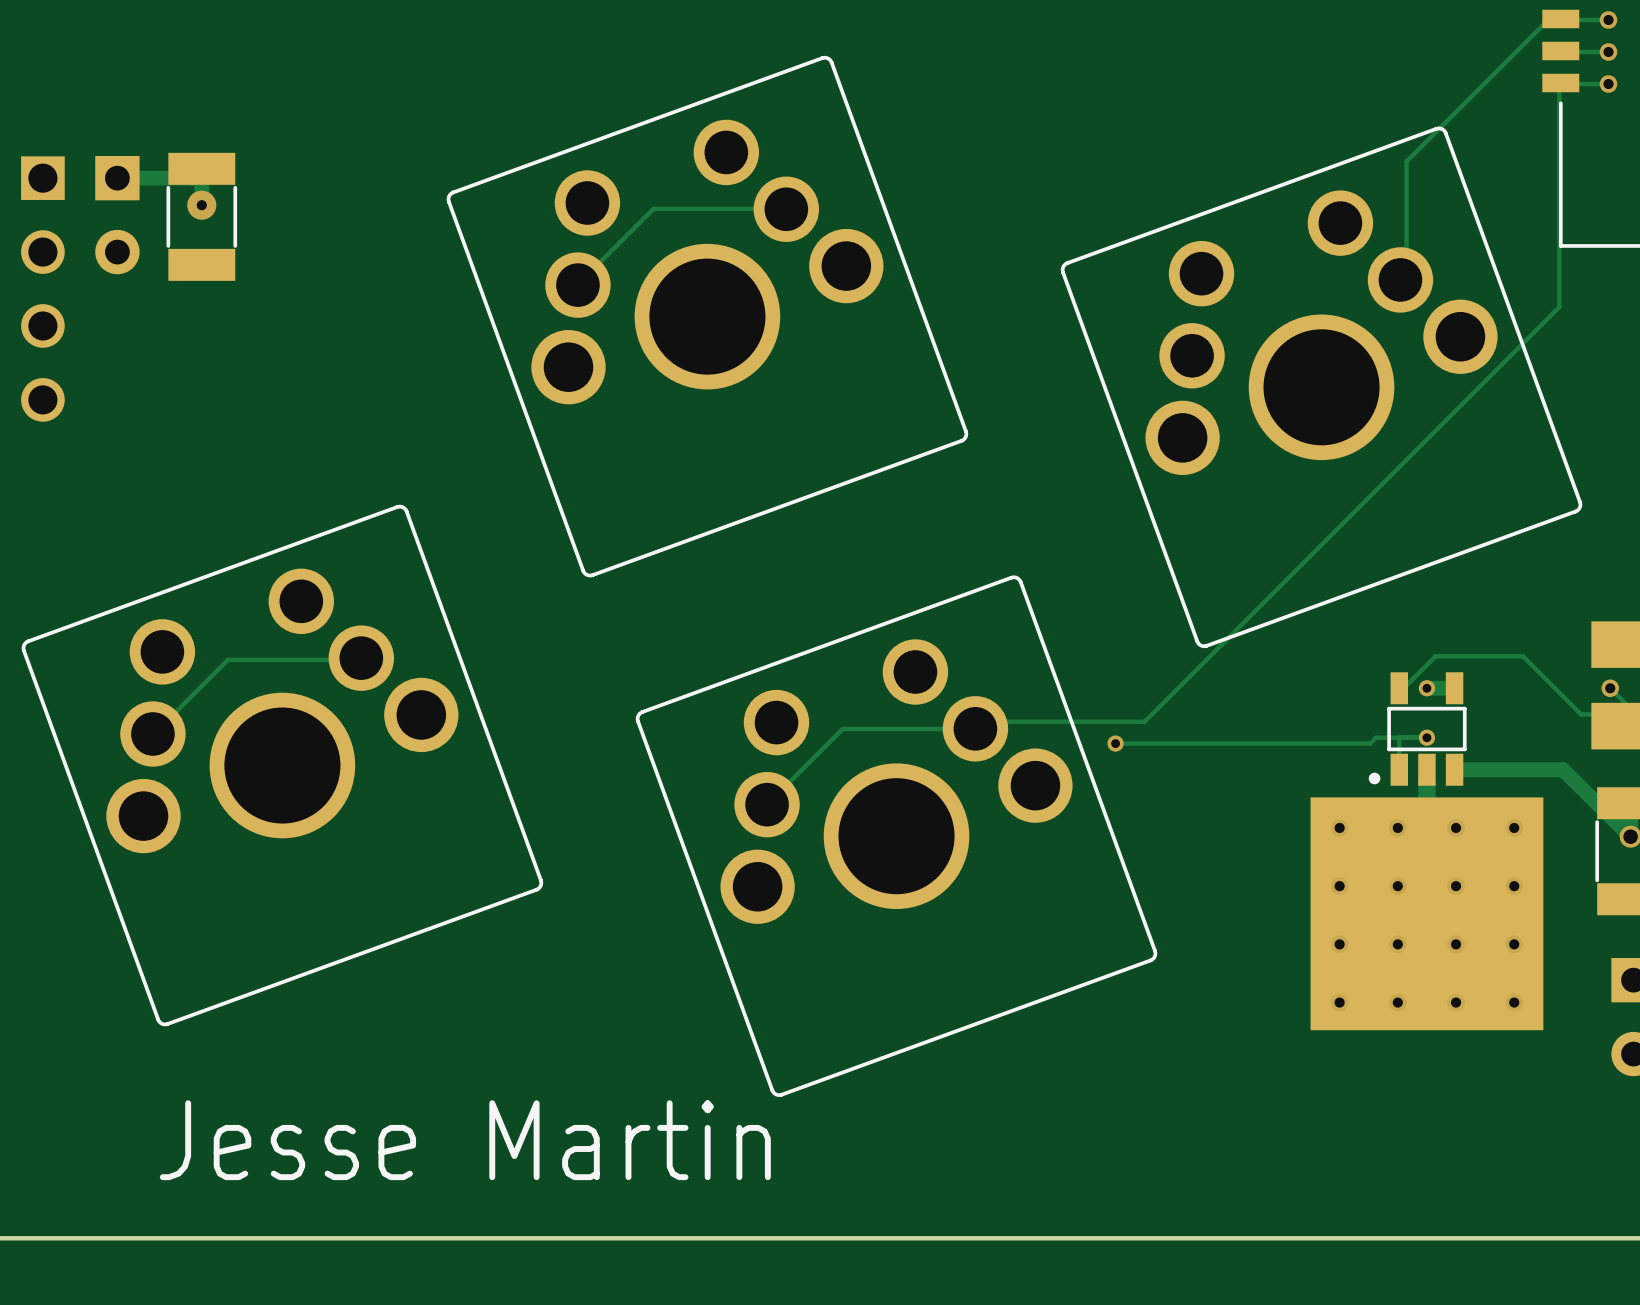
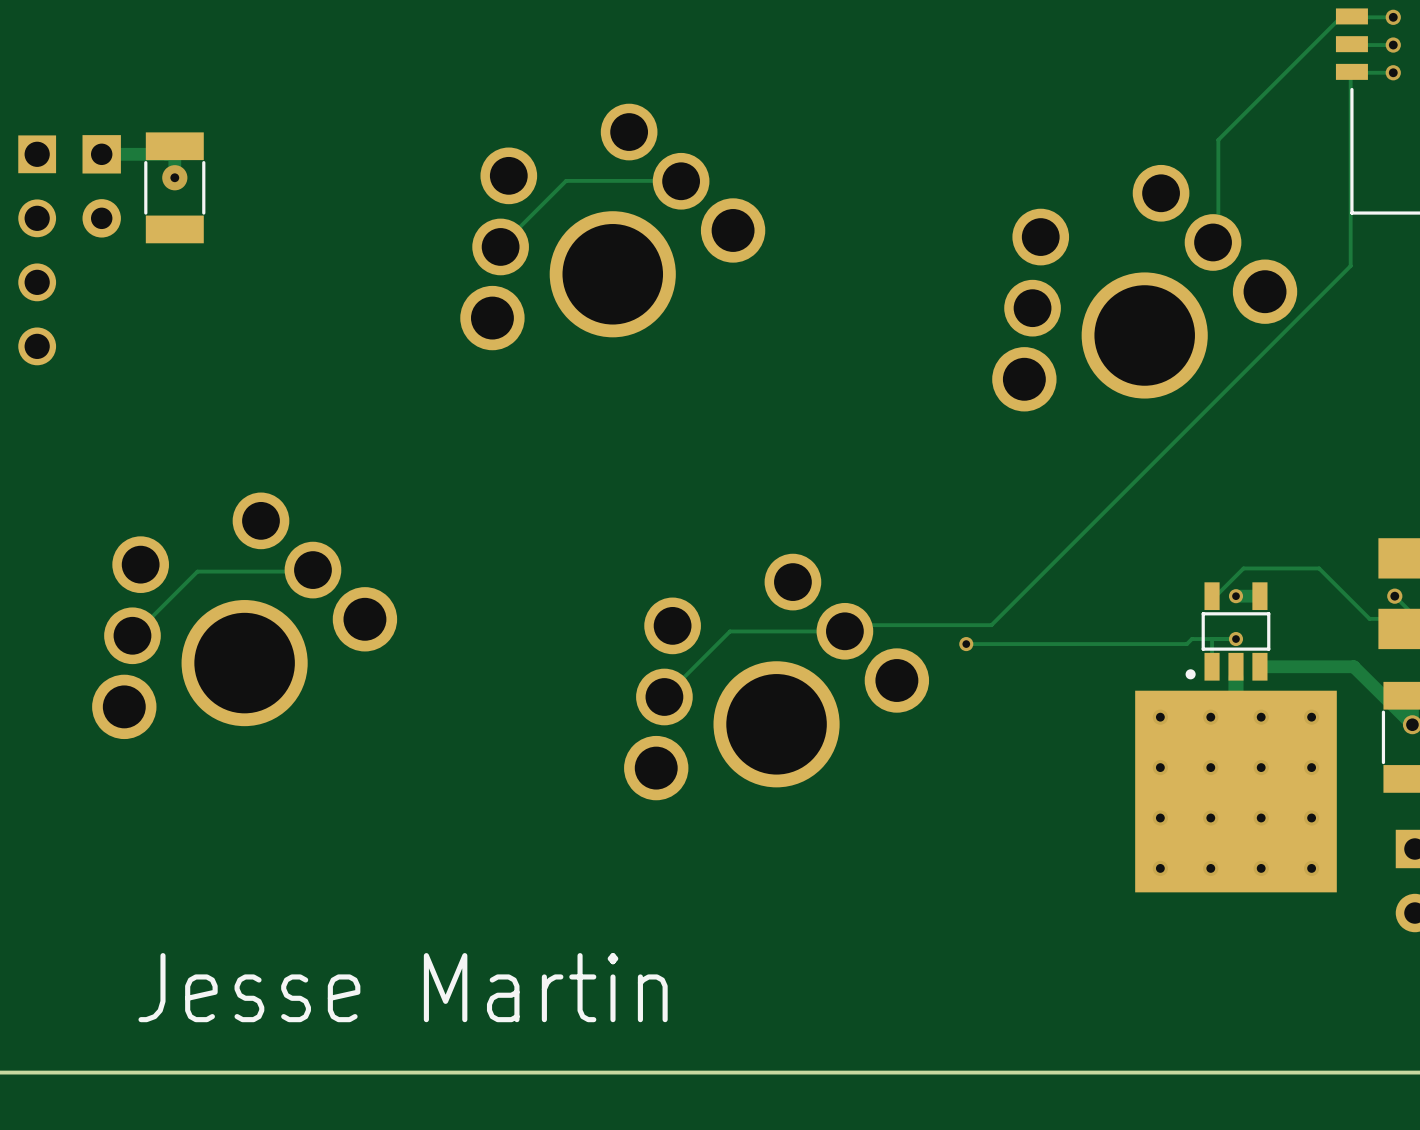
part: (707, 316) -> none
part: (1321, 387) -> none
part: (282, 765) -> none
part: (896, 836) -> none

